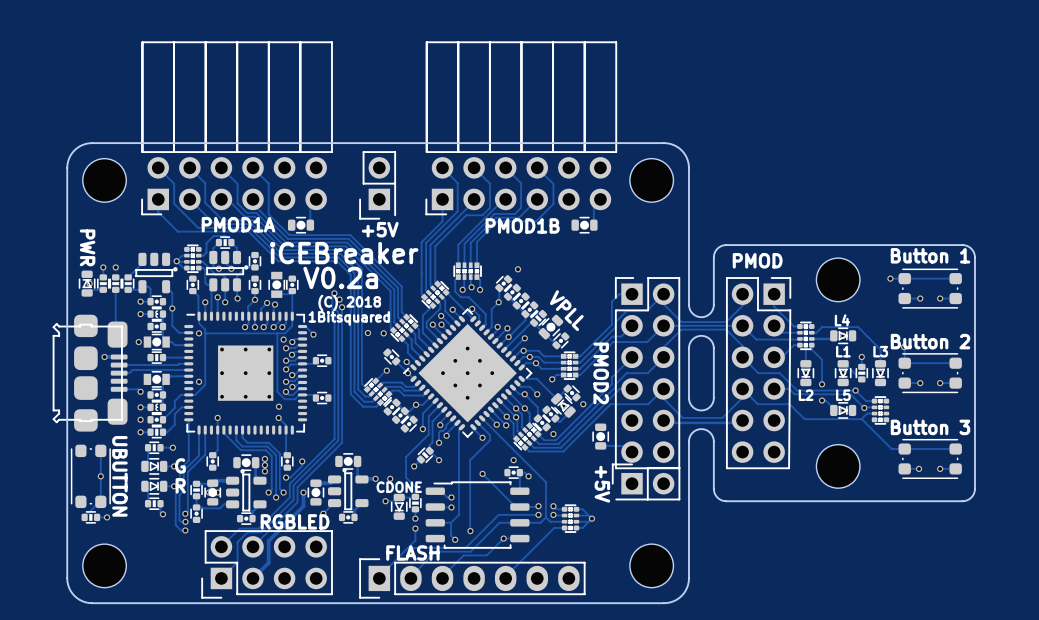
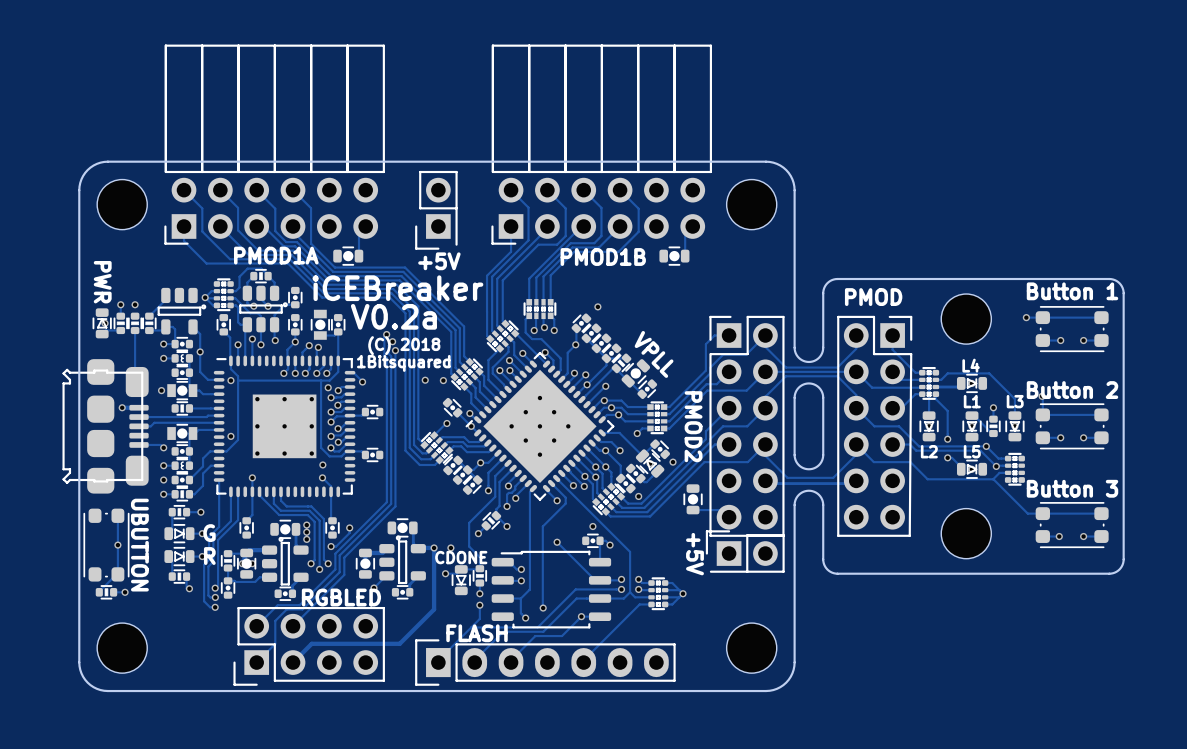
track: (303, 492) (303, 506) (268, 541) (268, 562) -> (434, 547) (434, 609) (399, 643) (311, 644)
via: (303, 492) -> none

